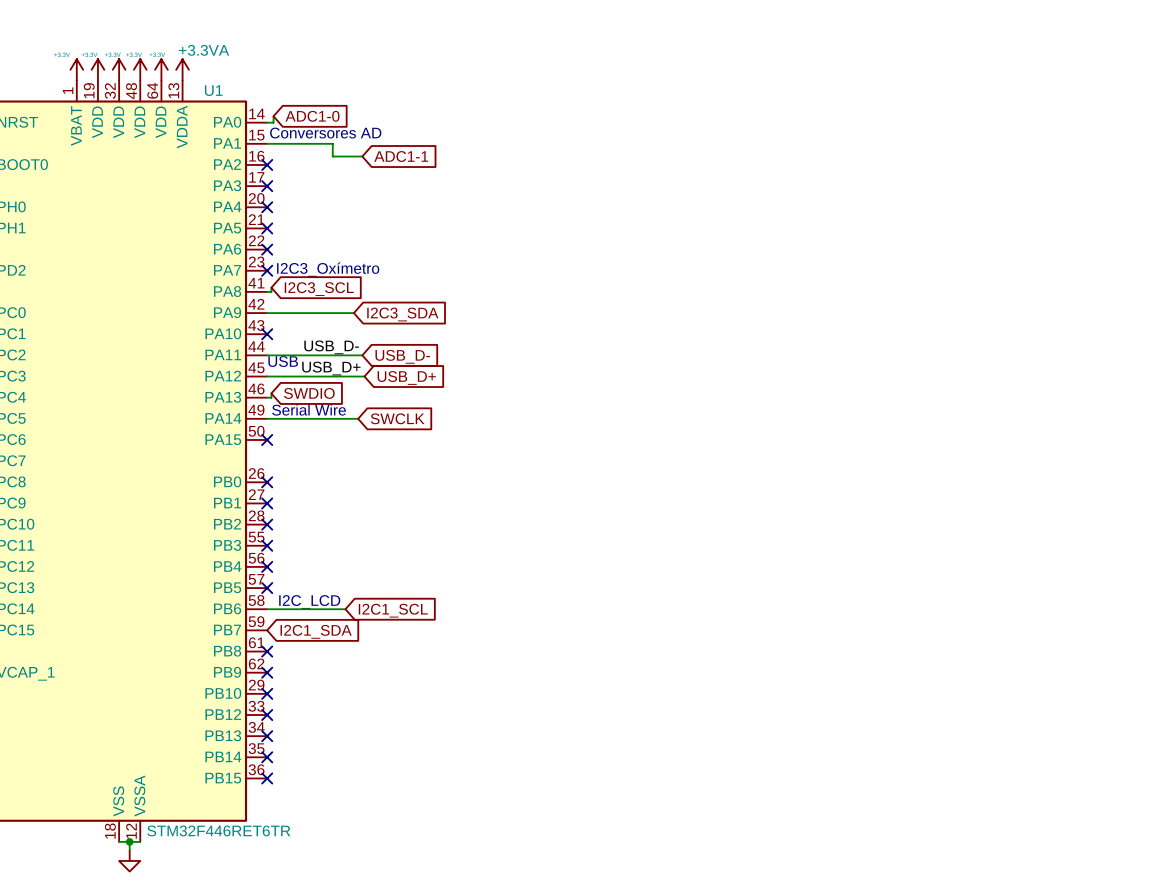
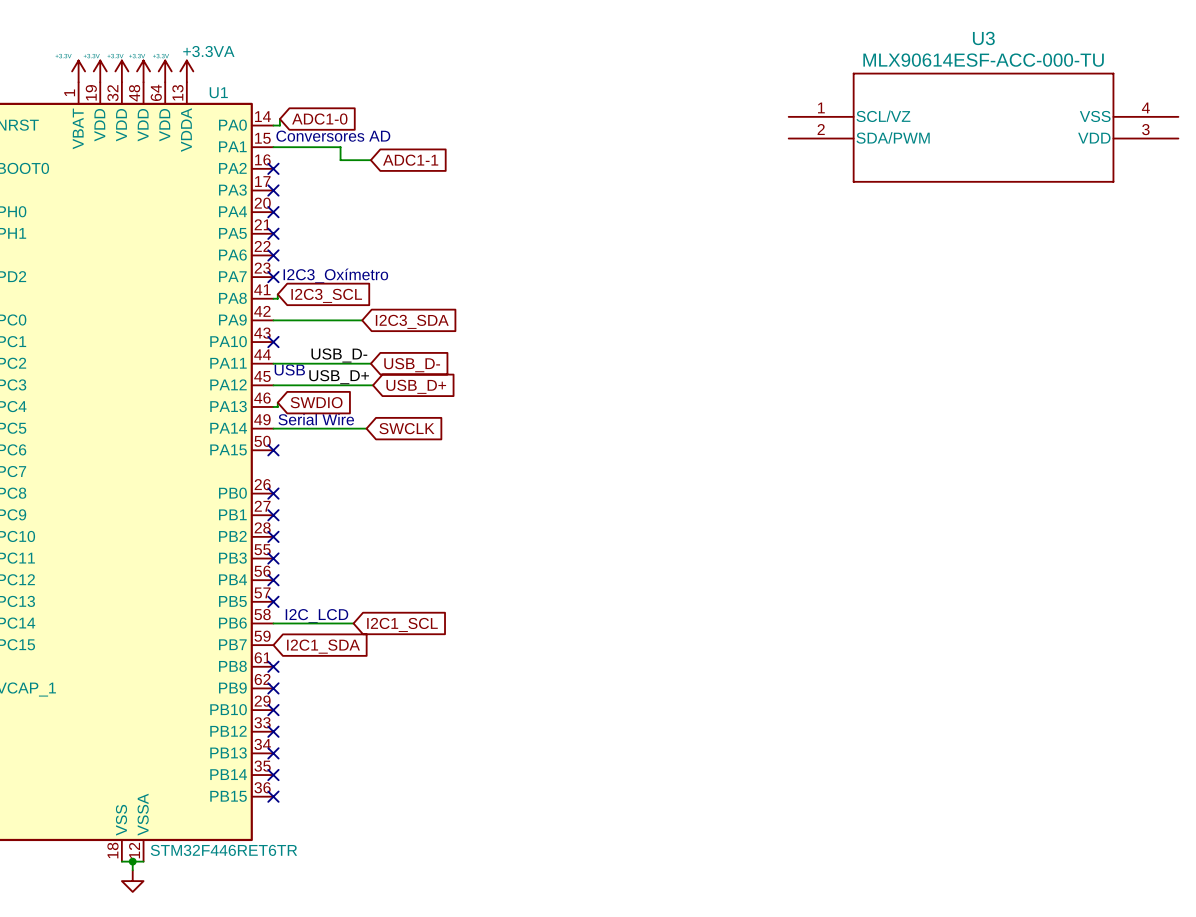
U3: none -> MLX90614ESF-ACC-000-TU (983, 127)

